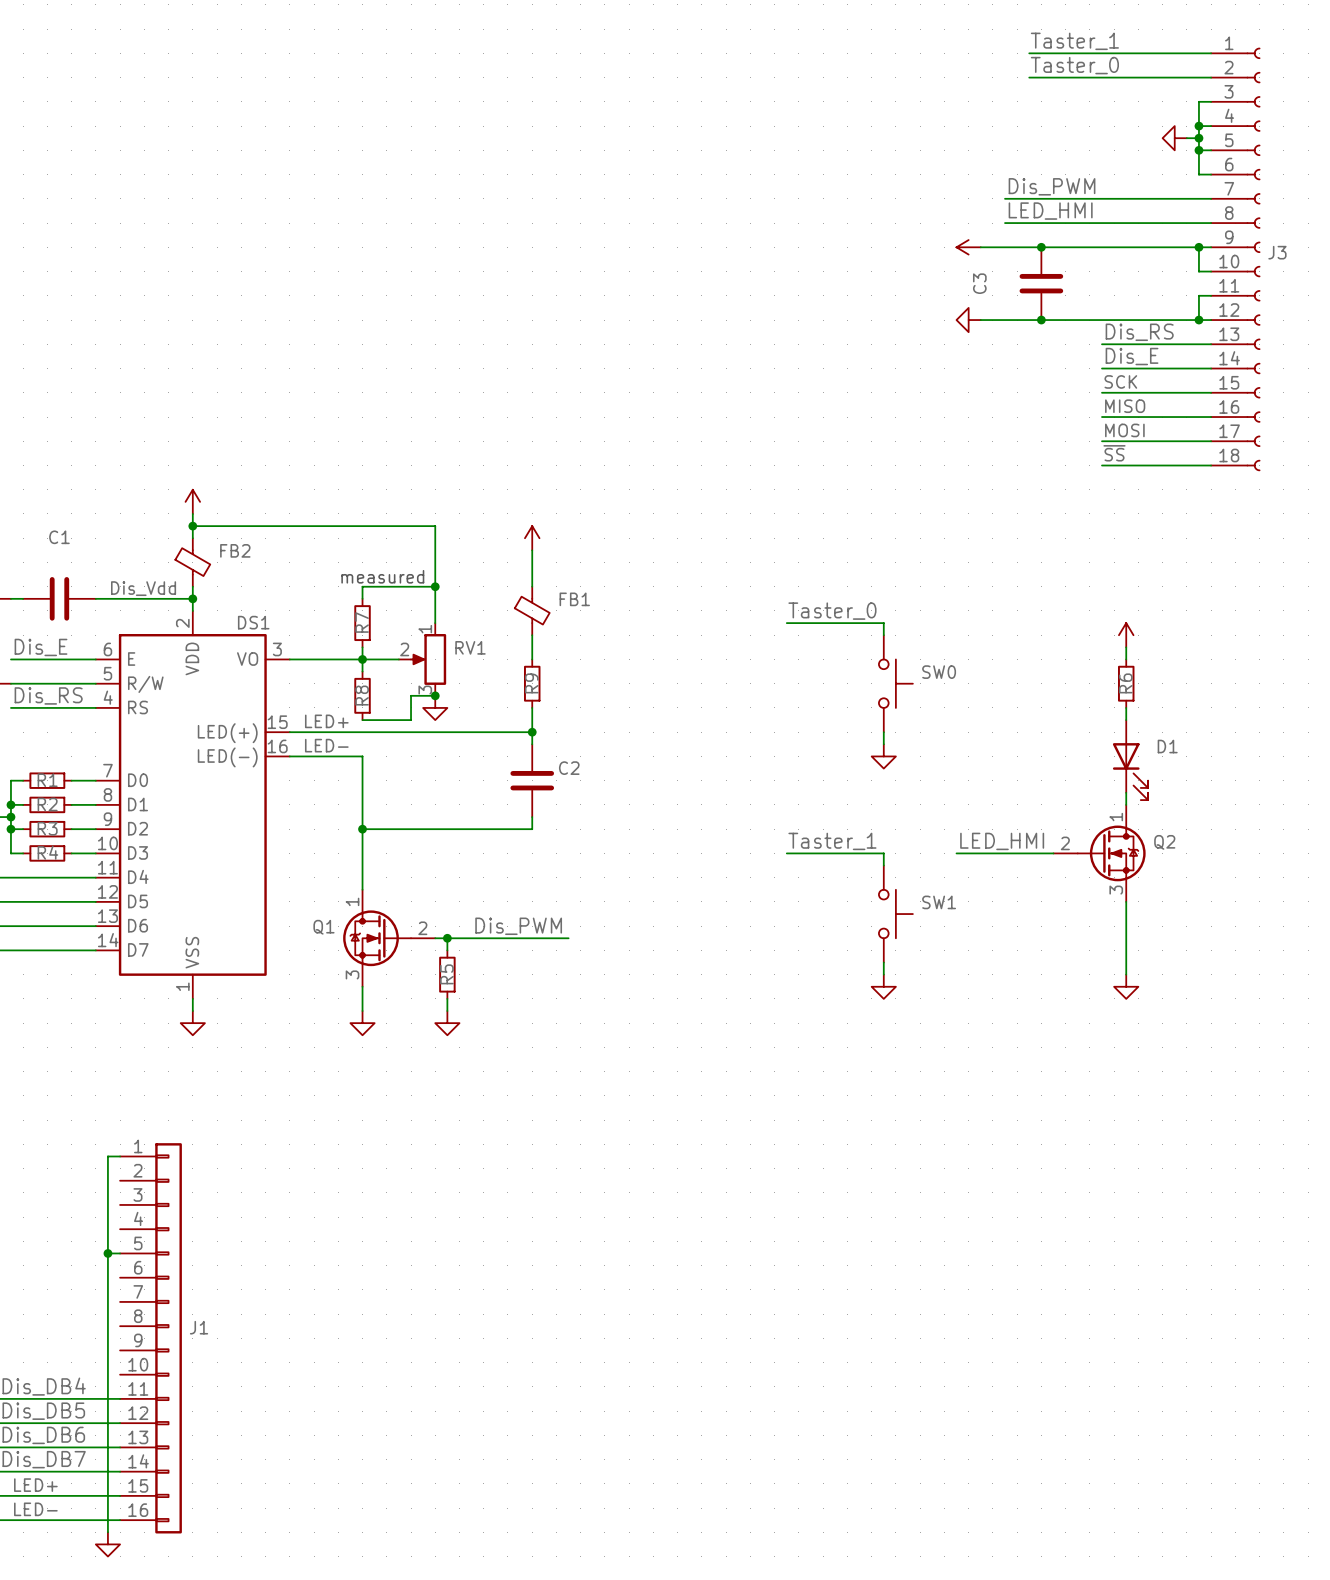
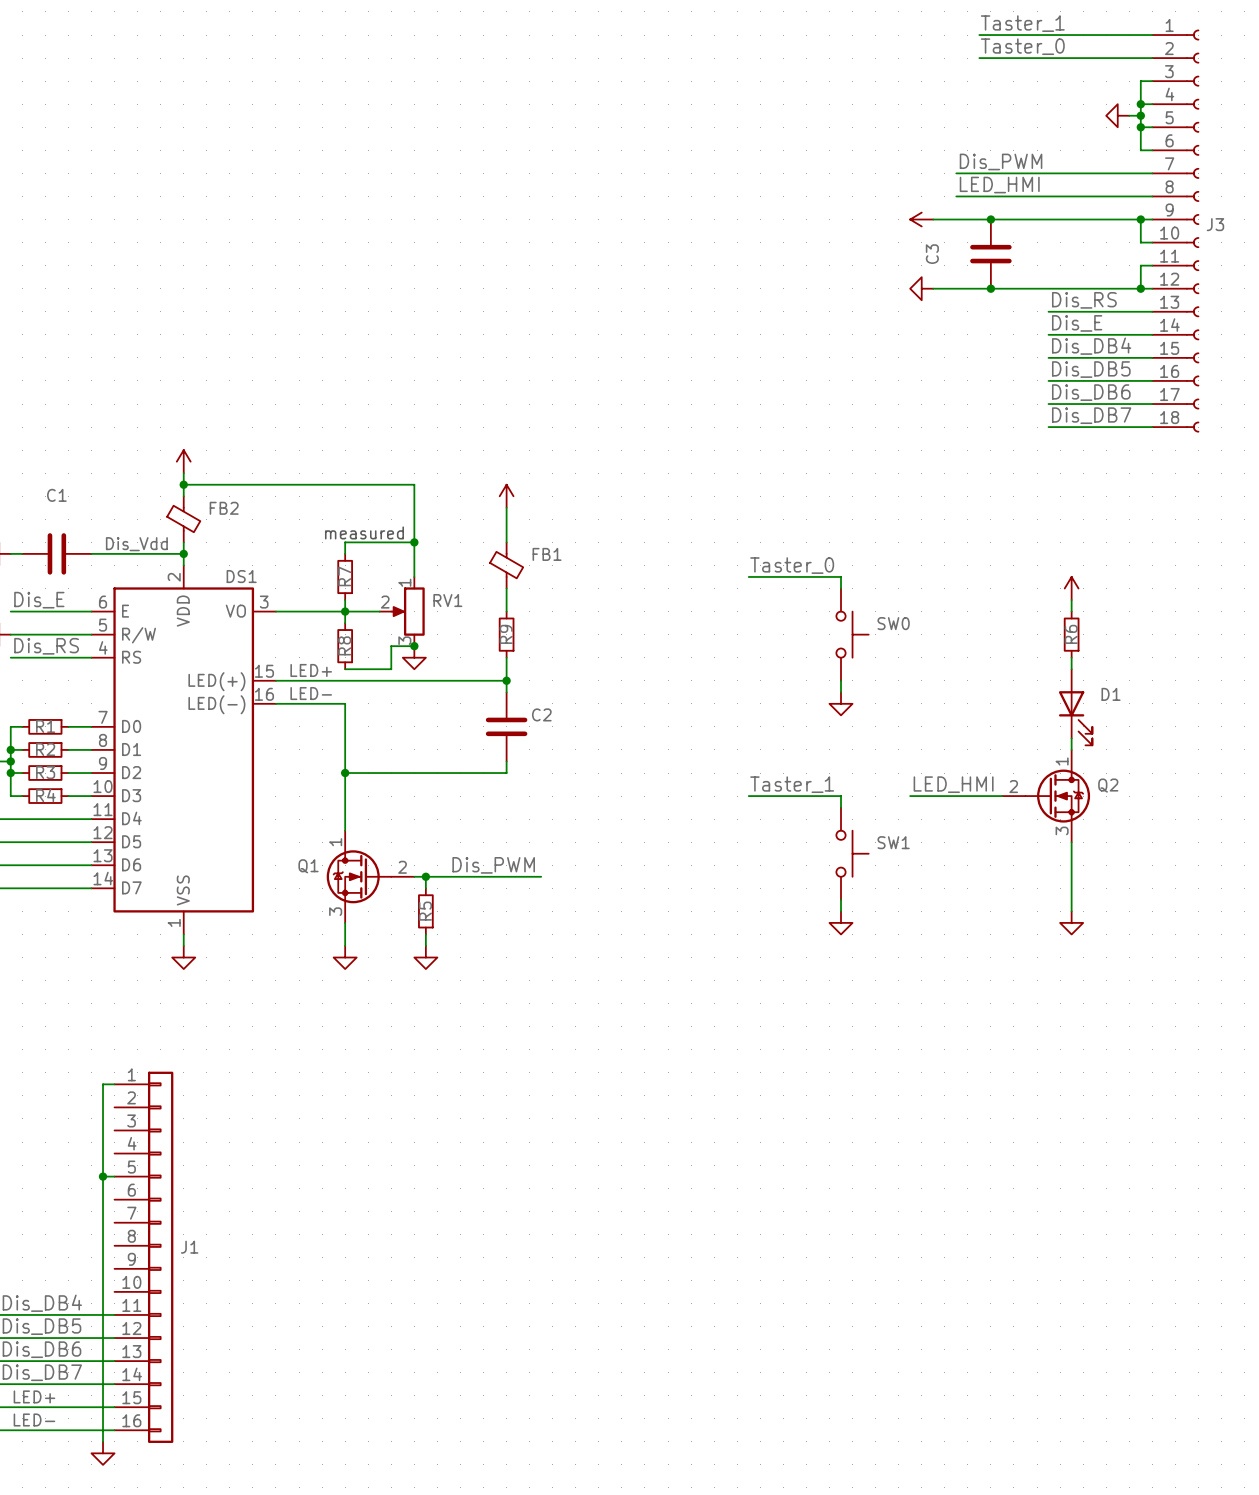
label: SCK (1120, 381) -> Dis_DB4 (1091, 346)
label: MISO (1125, 406) -> Dis_DB5 (1091, 369)
label: MOSI (1124, 430) -> Dis_DB6 (1091, 392)
label: ~{SS} (1114, 453) -> Dis_DB7 (1091, 415)

